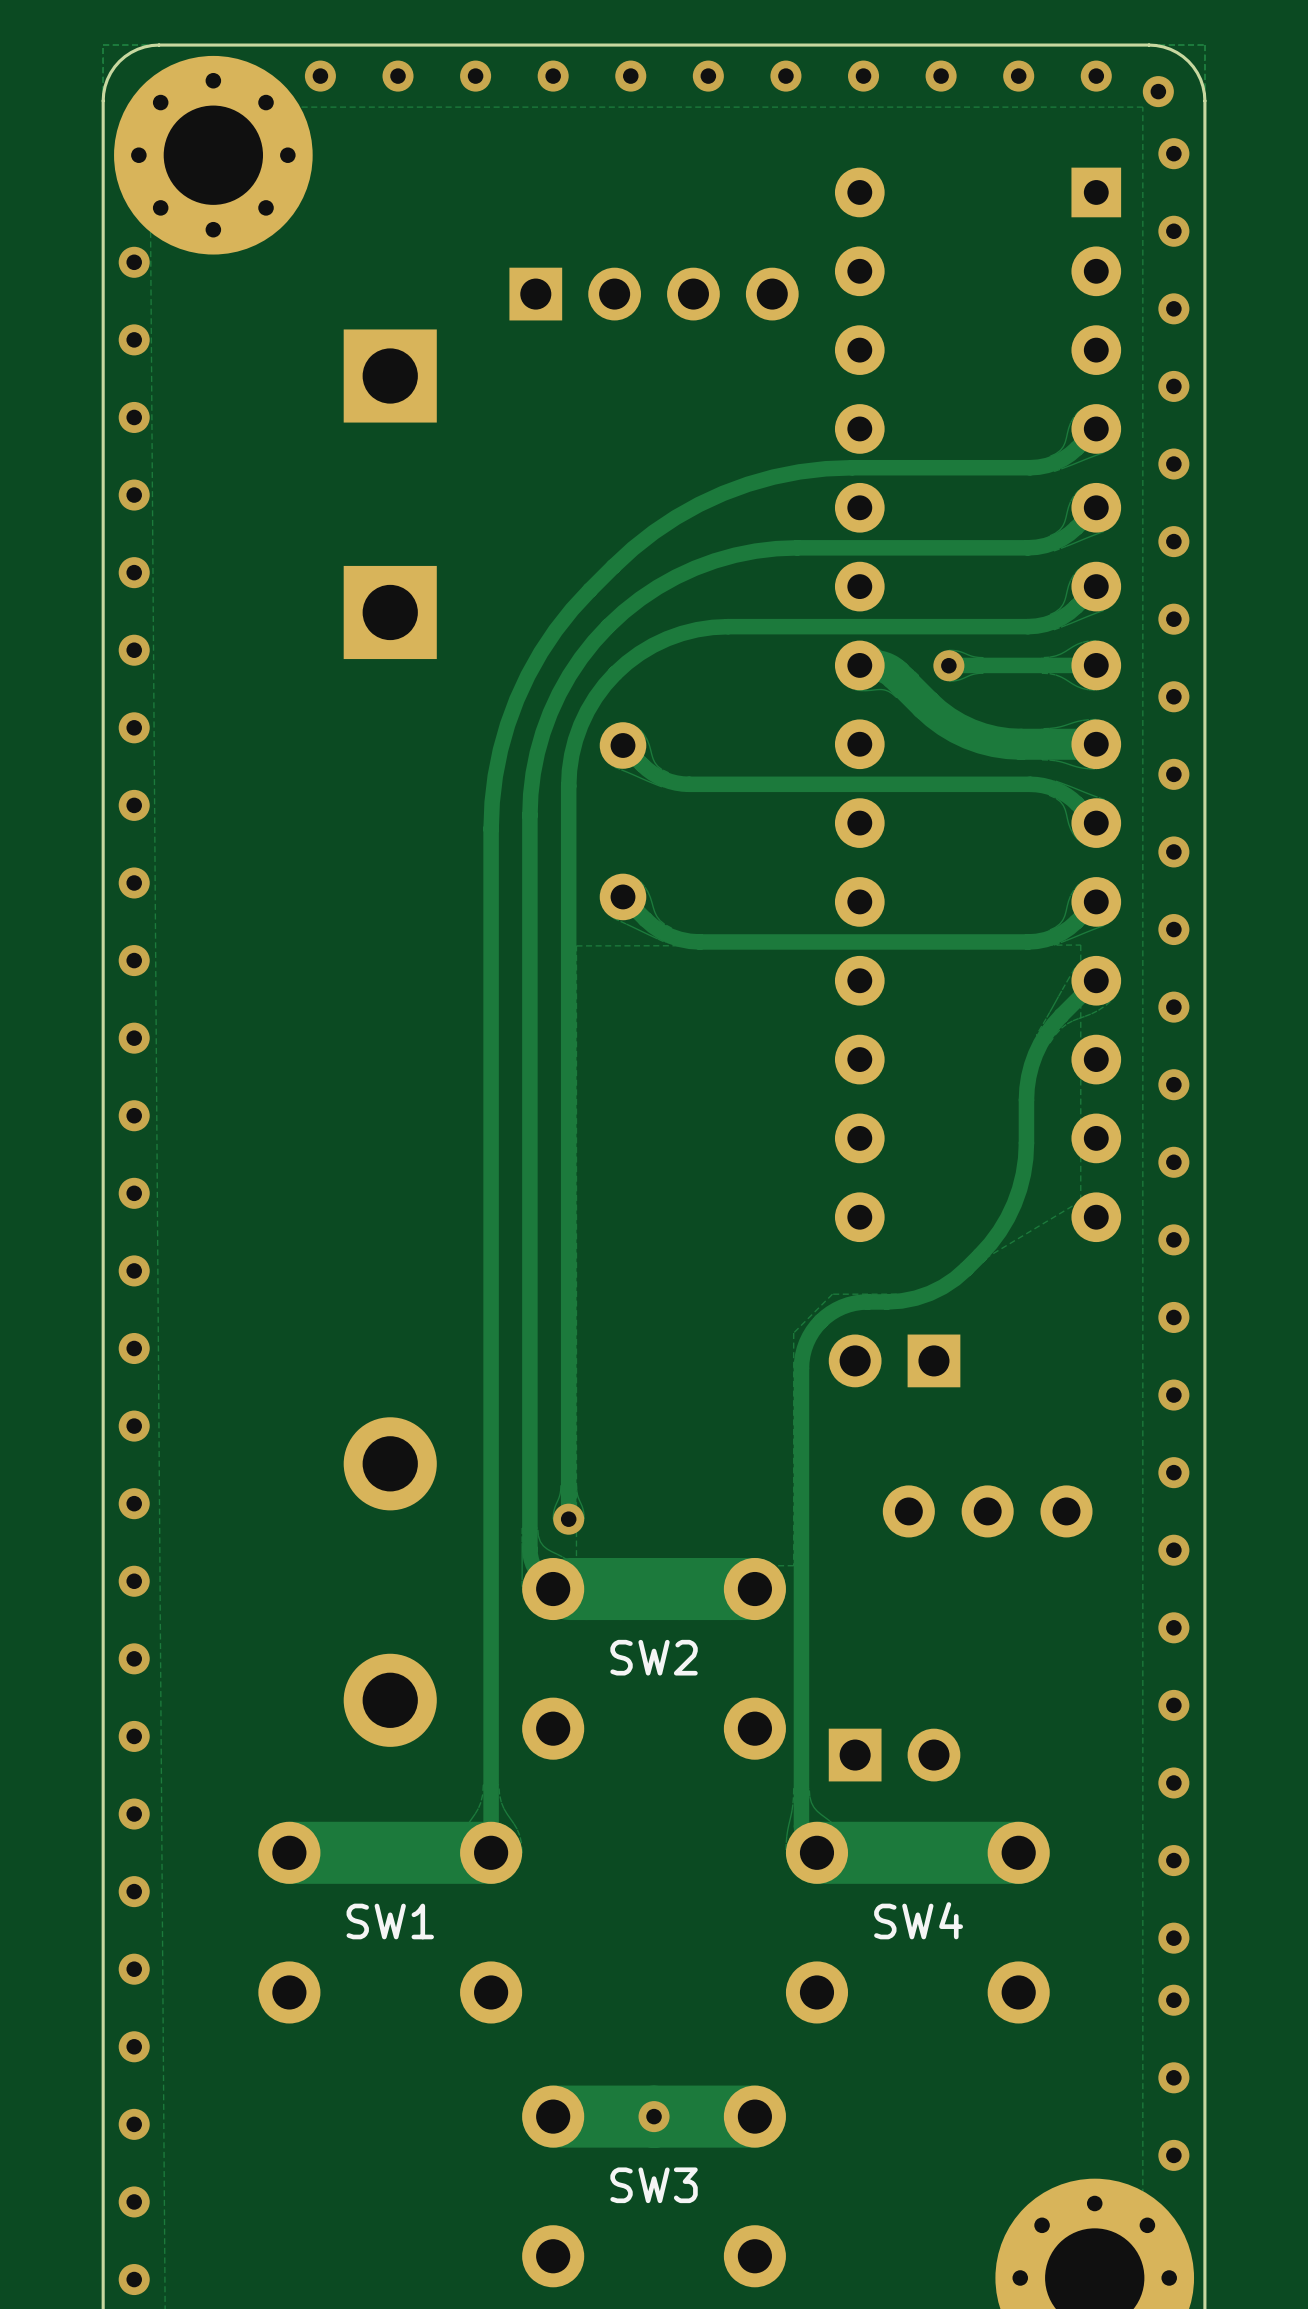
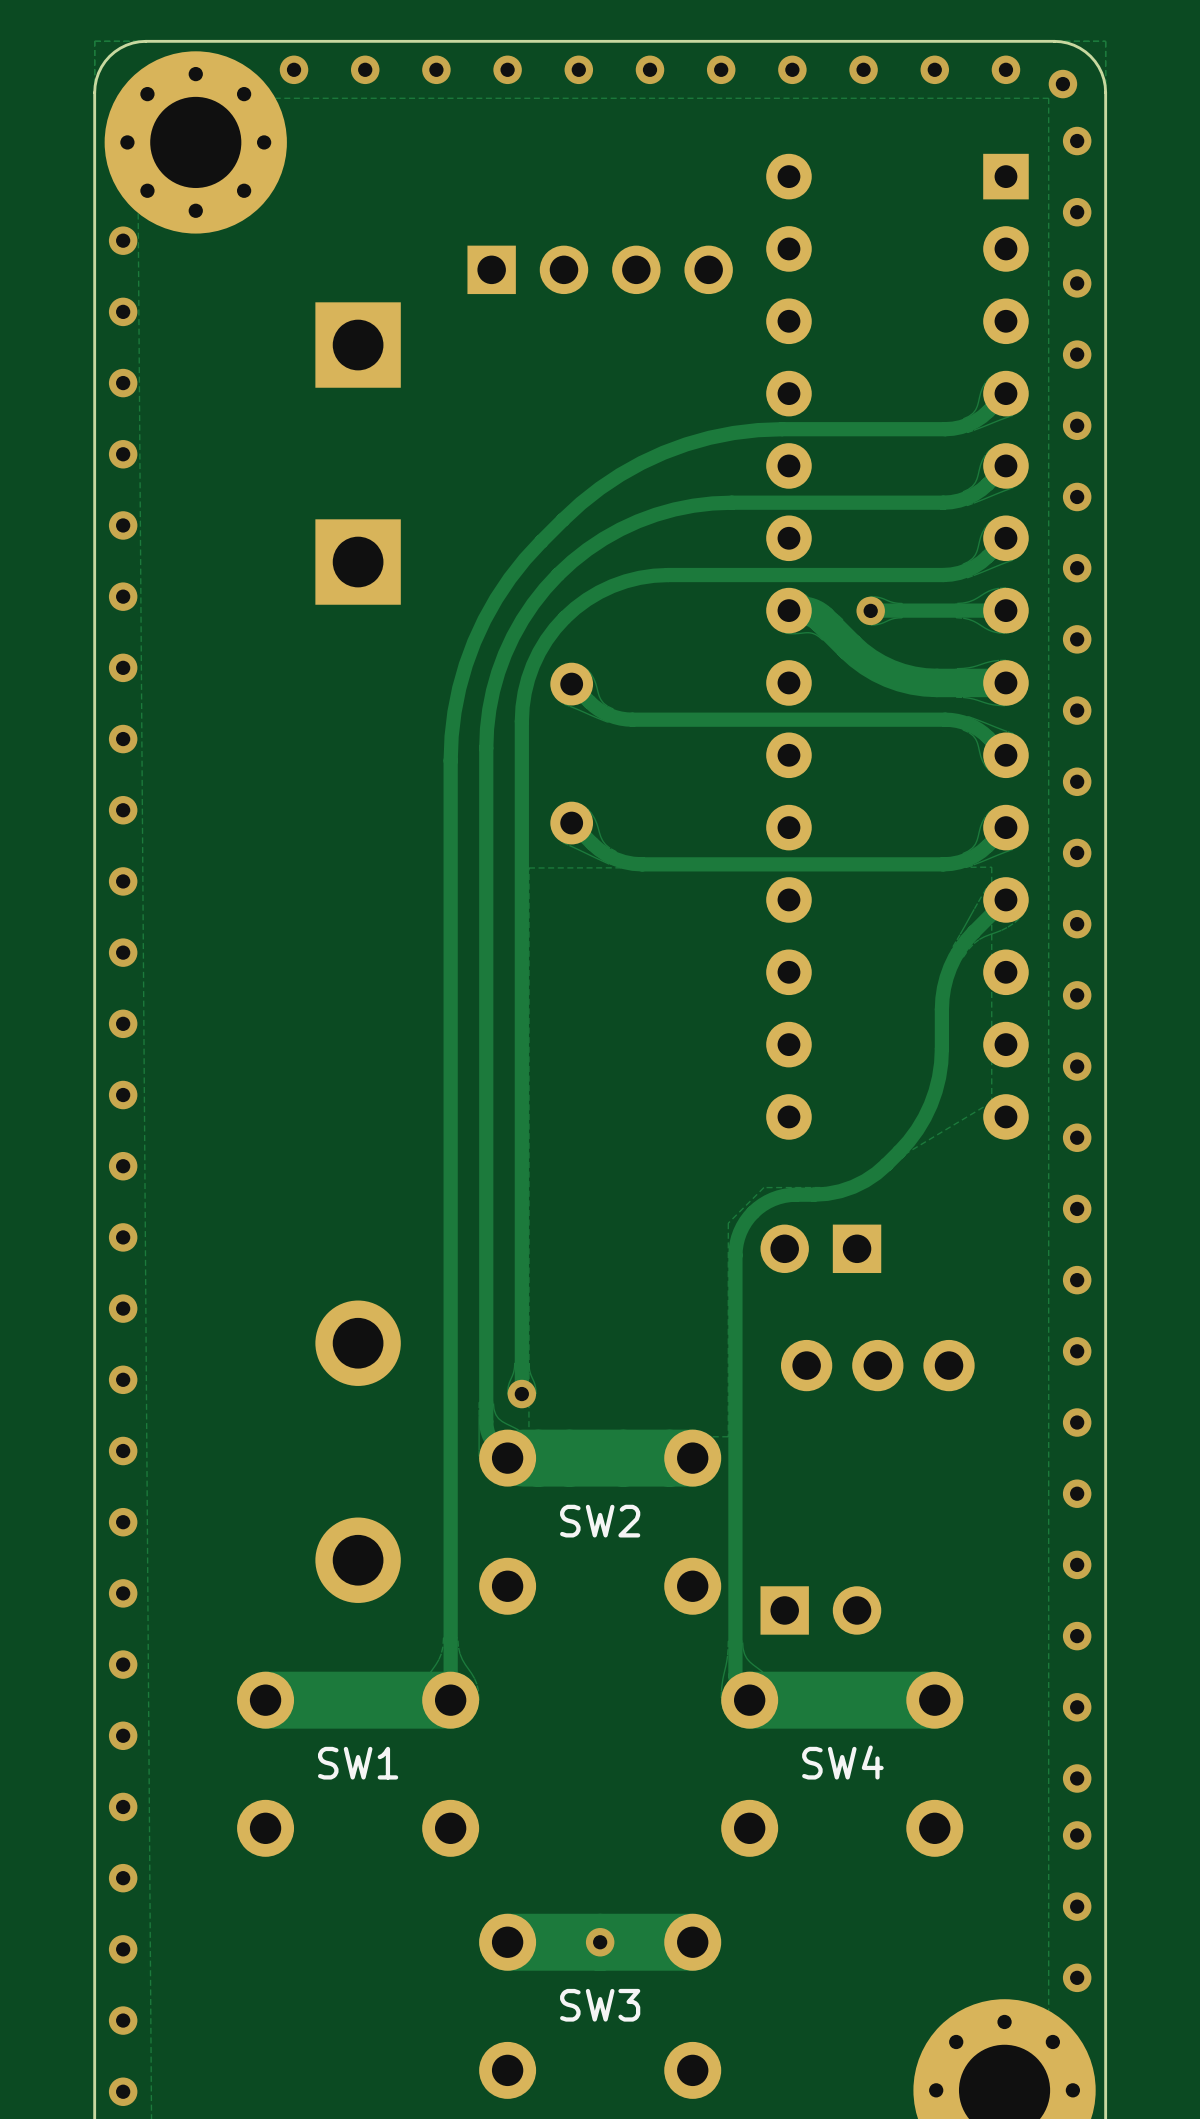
part: none -> (877, 1365)
part: (987, 1511) -> none

